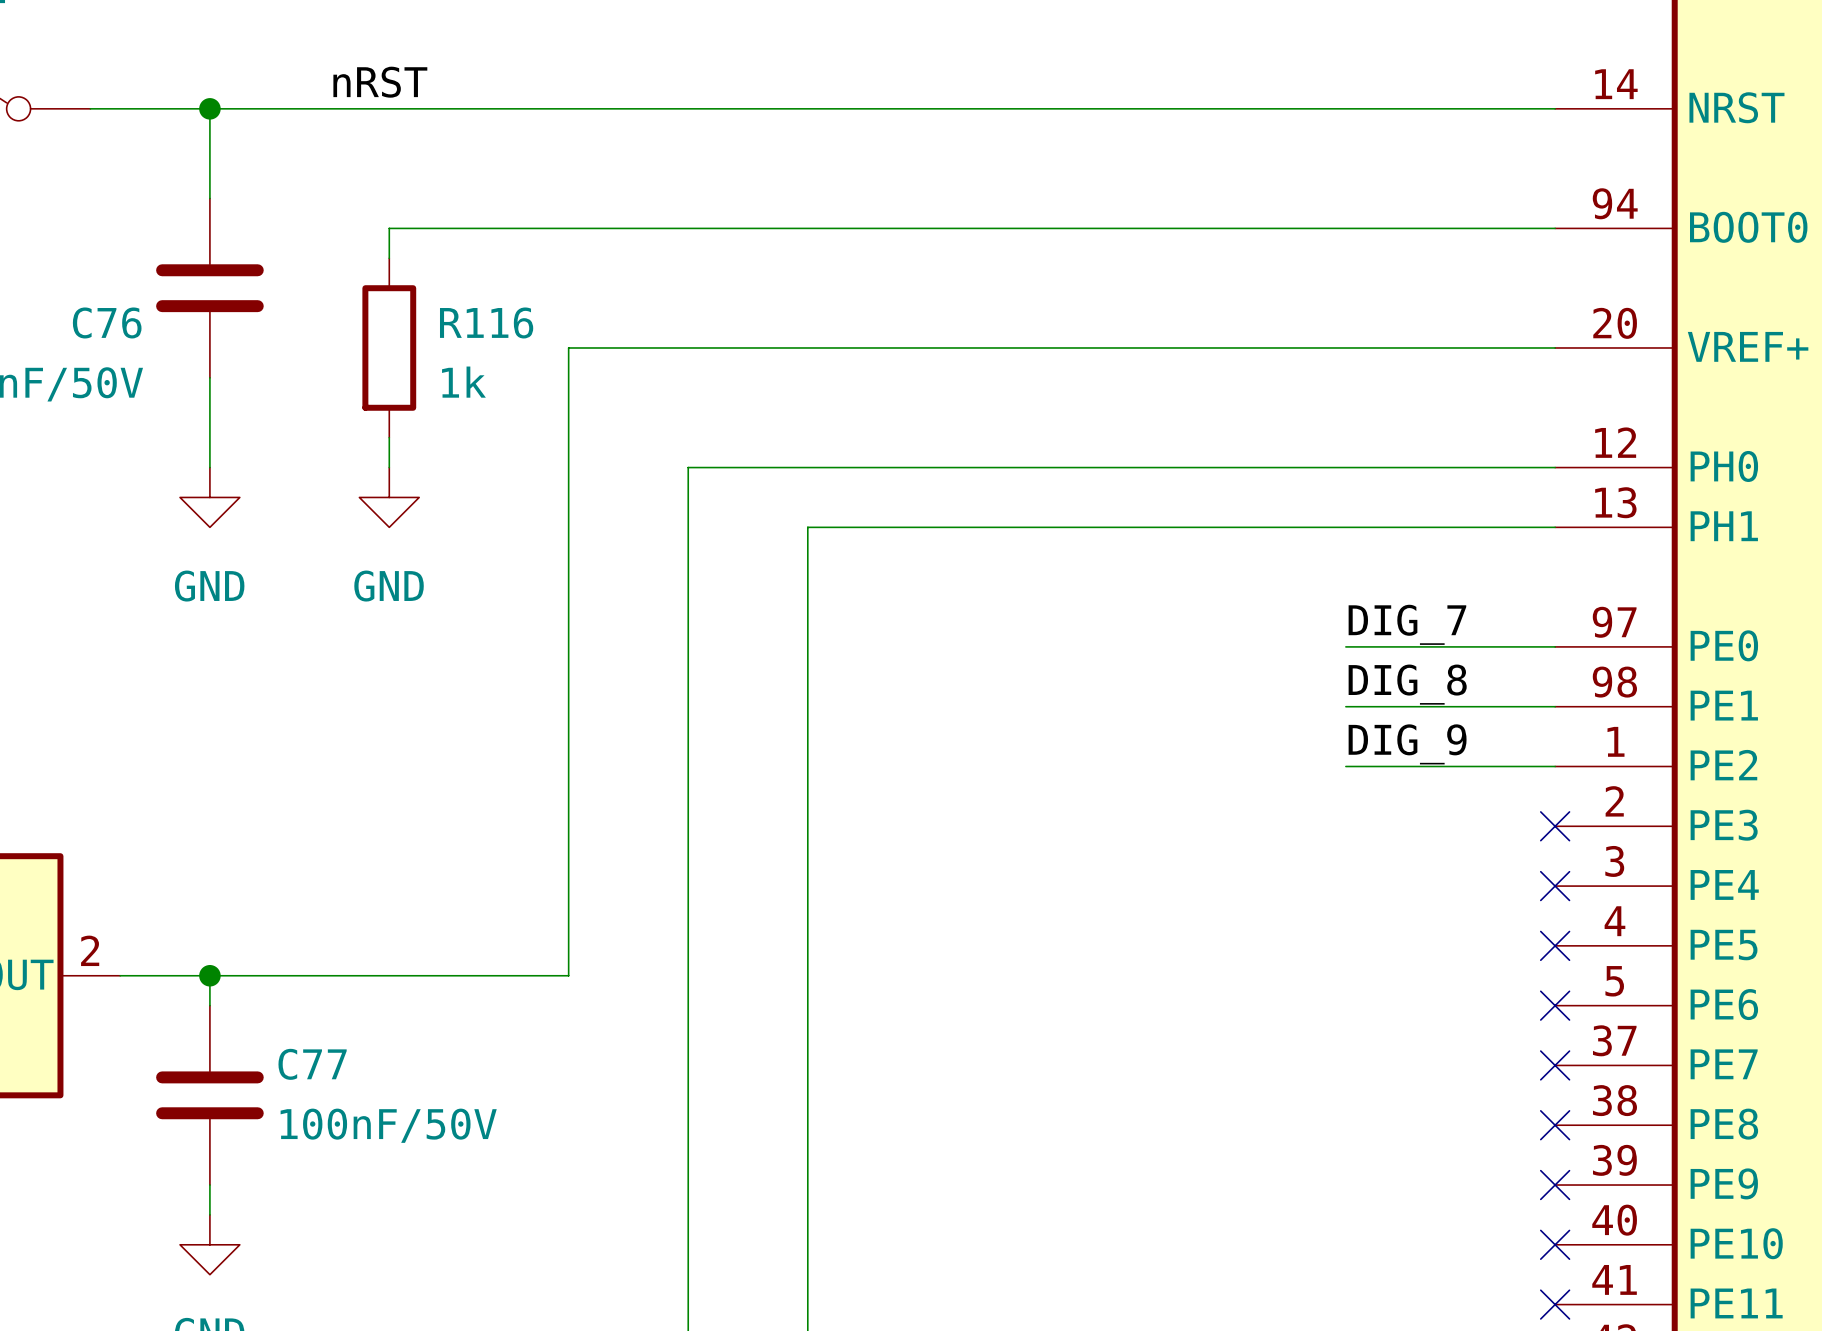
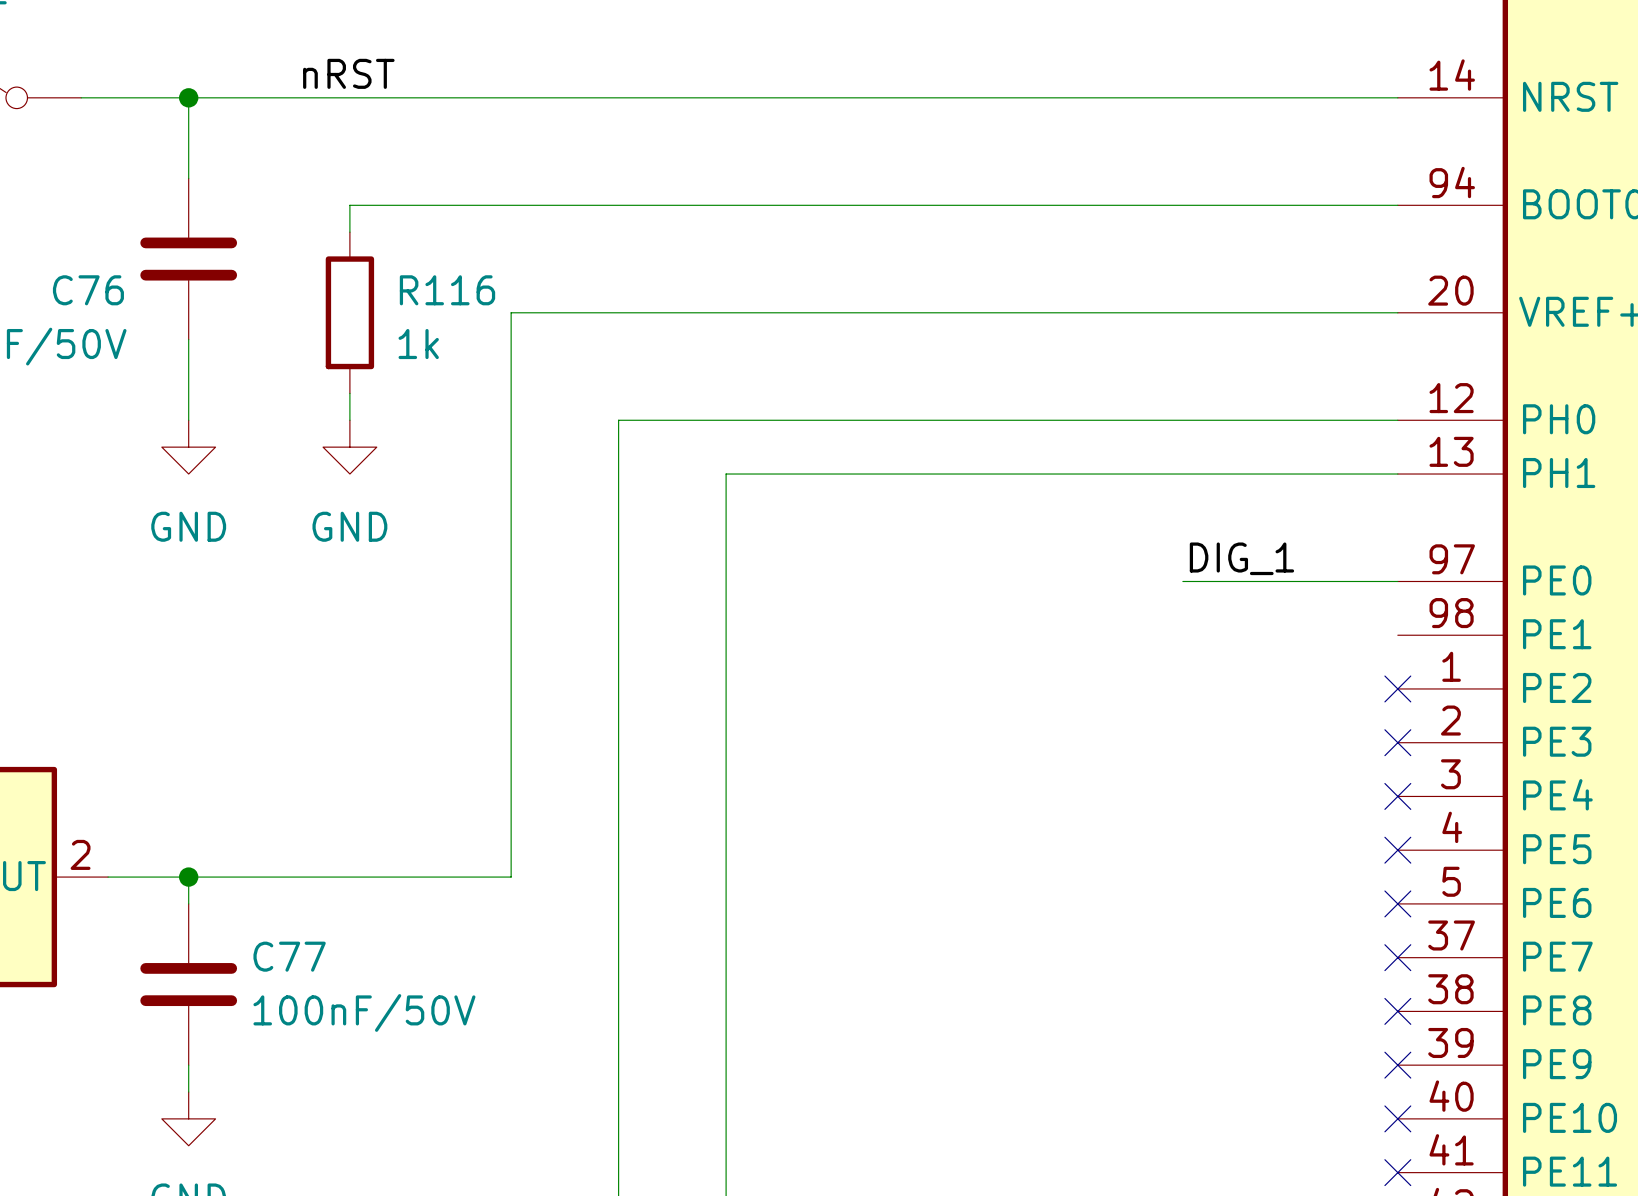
label: DIG_7 (1407, 624) -> DIG_1 (1241, 558)
wire: none -> (1182, 581) (1209, 581)
label: DIG_8 (1407, 684) -> none
wire: (1345, 706) (1555, 706) -> none
label: DIG_9 (1407, 744) -> none
wire: (1345, 766) (1555, 766) -> none
no-connect mark: none -> (1397, 688)

